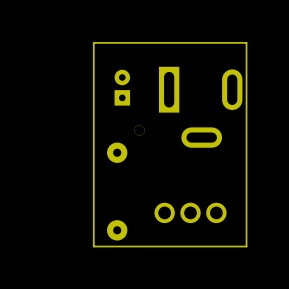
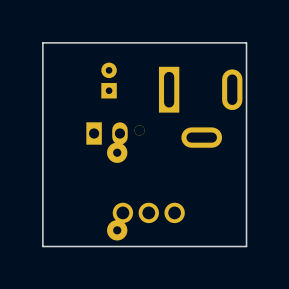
board edge: (93, 42) (93, 246) -> (93, 42) (42, 42) (42, 246) (93, 246)
part position: (122, 87) -> (109, 80)
part: none -> (107, 133)
part position: (190, 212) -> (148, 212)

